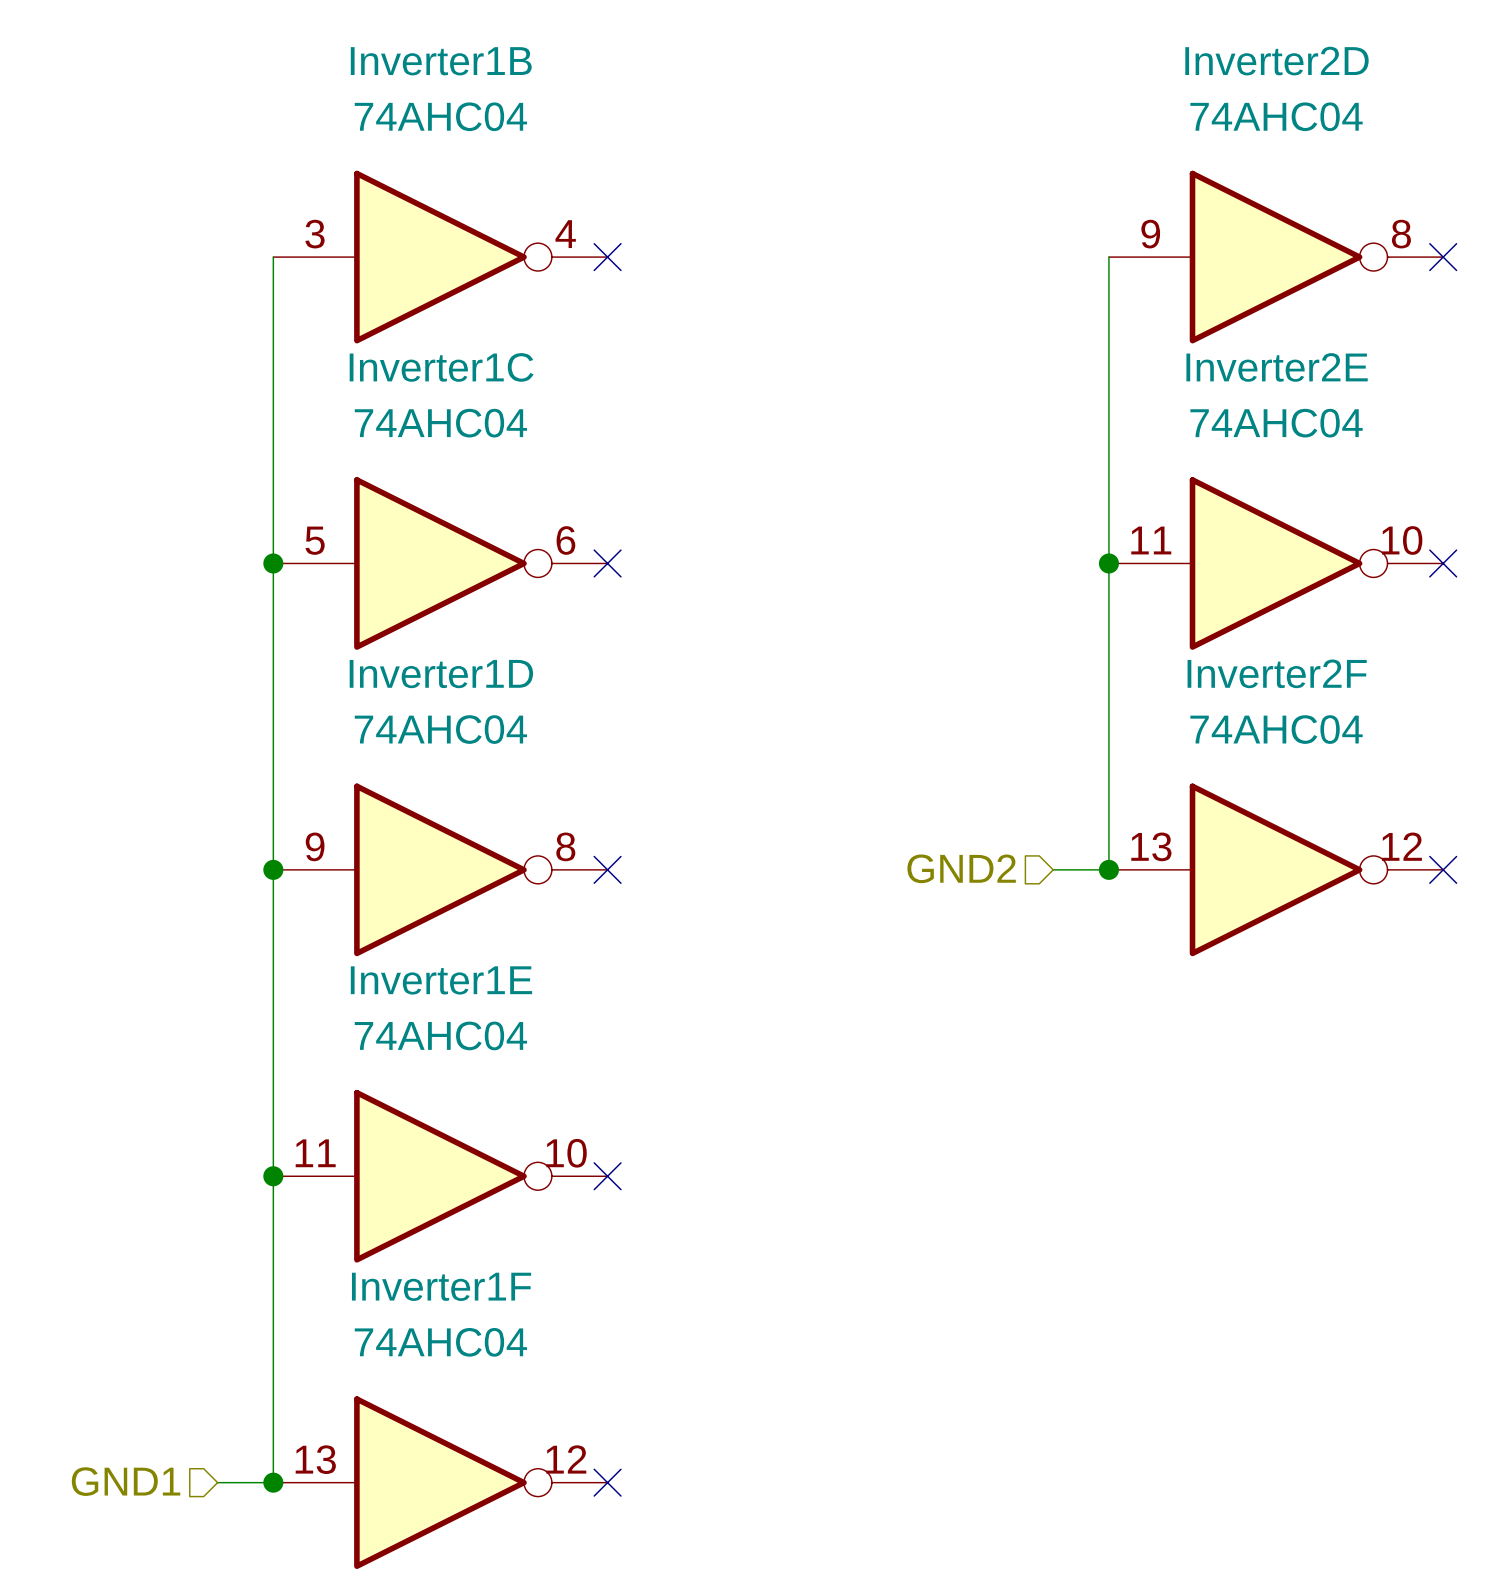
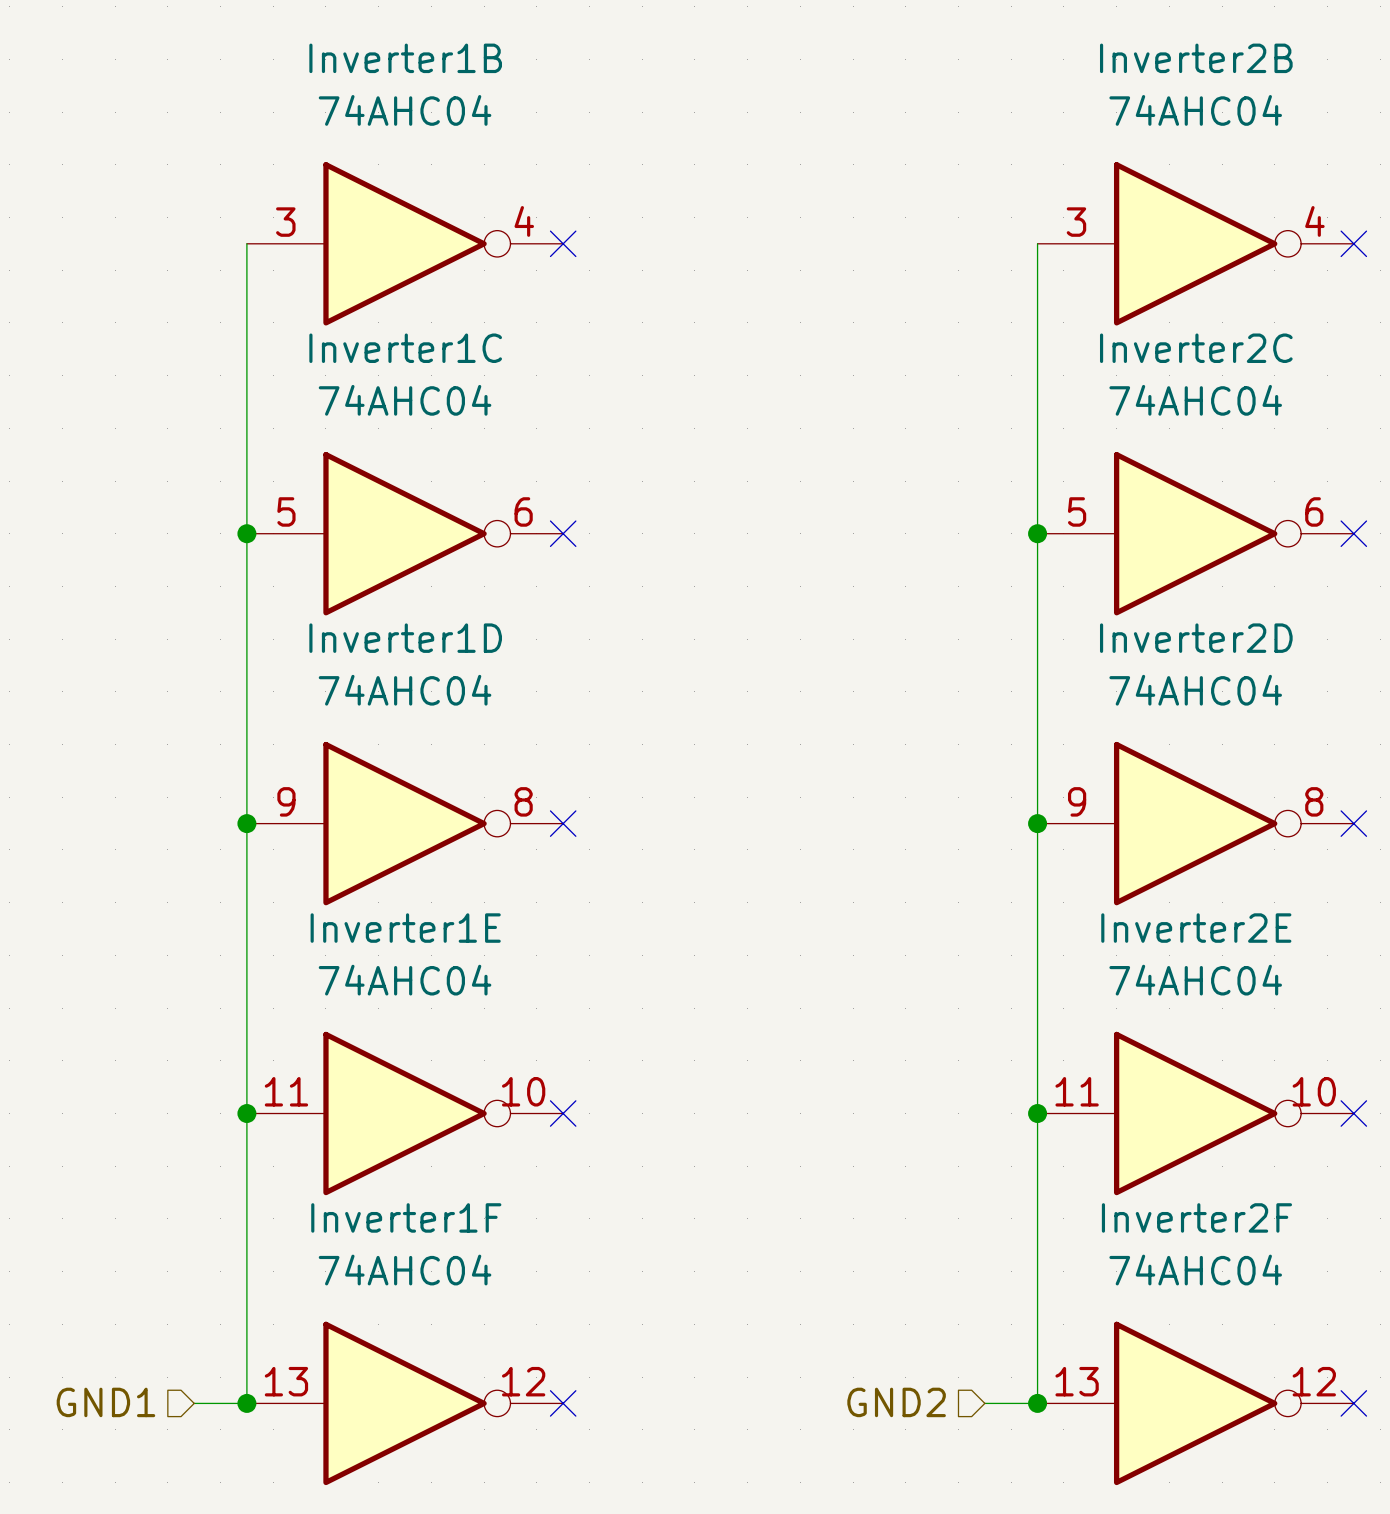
Inverter2D position: (1276, 257) -> (1195, 823)
Inverter2B: none -> 74AHC04 (1195, 243)
Inverter2E position: (1276, 563) -> (1195, 1113)
Inverter2C: none -> 74AHC04 (1195, 533)
hierarchical label: GND2 (961, 868) -> none
wire: (1053, 869) (1108, 869) -> (984, 1403) (1037, 1403) (1037, 823)
Inverter2F position: (1276, 869) -> (1195, 1403)
junction: none -> (1037, 1113)
no-connect mark: none -> (1353, 1113)
hierarchical label: none -> GND2 (896, 1402)
junction: none -> (1037, 1403)
no-connect mark: none -> (1353, 1403)

